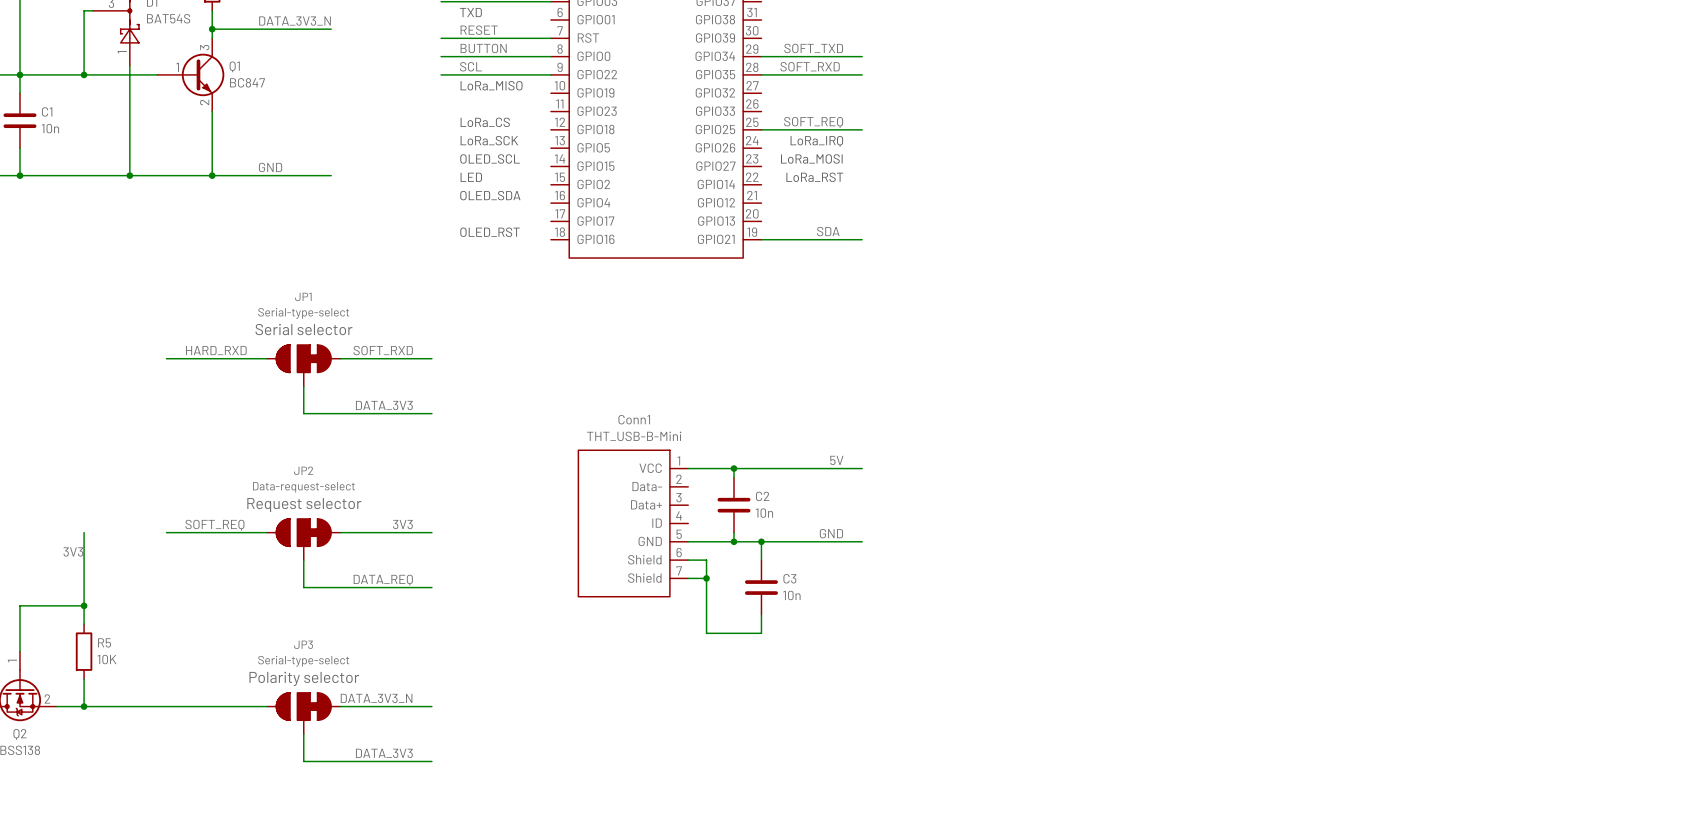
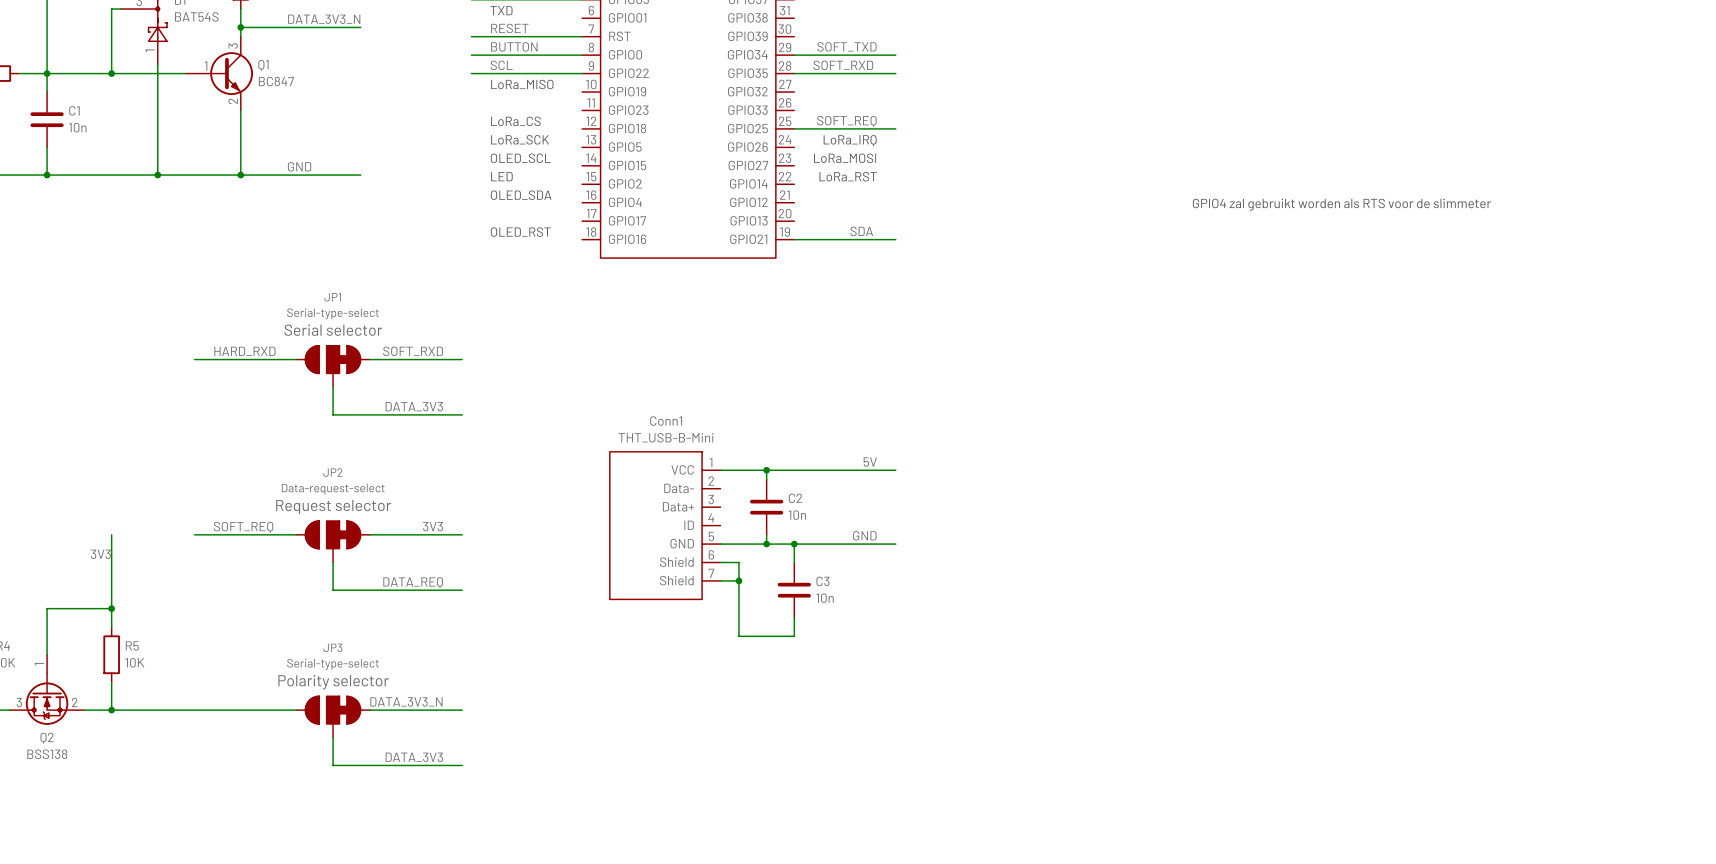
text: none -> GPIO4 zal gebruikt worden als RTS voor de slimmeter (1341, 204)

